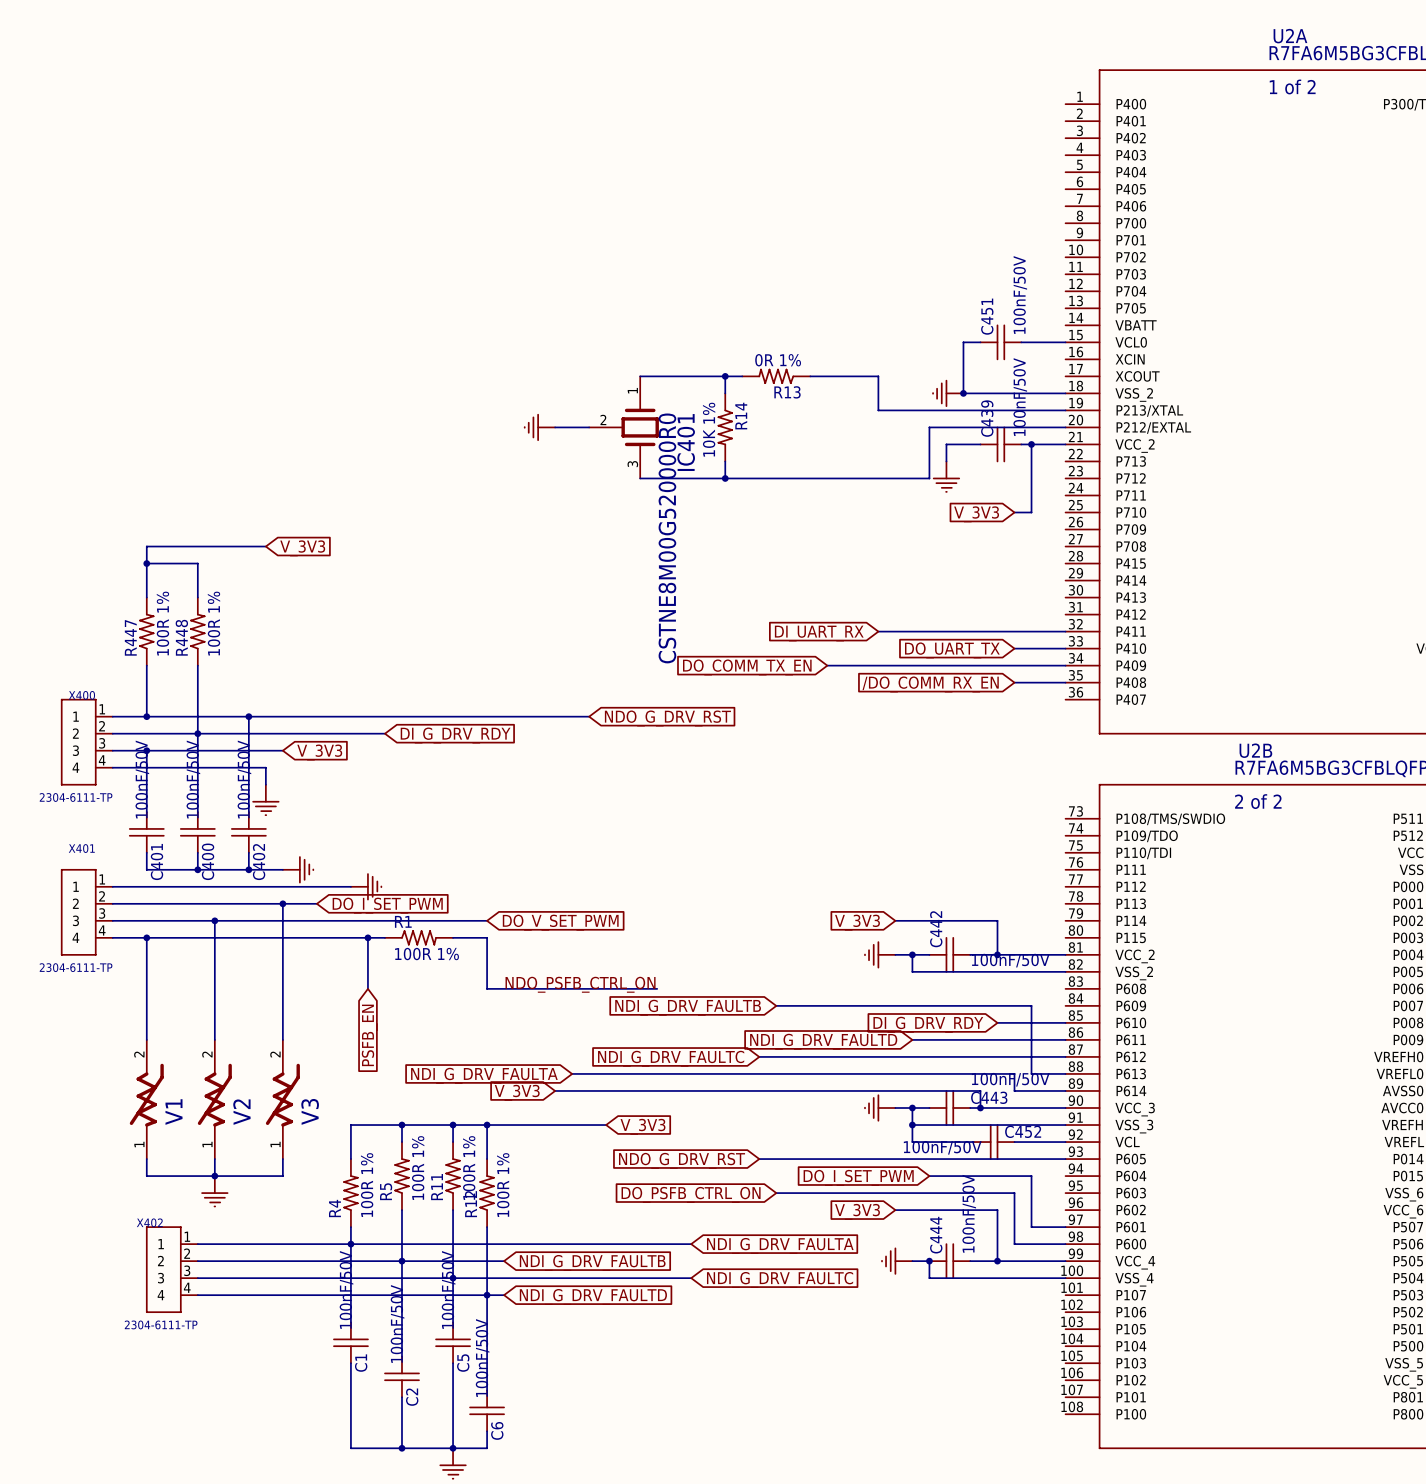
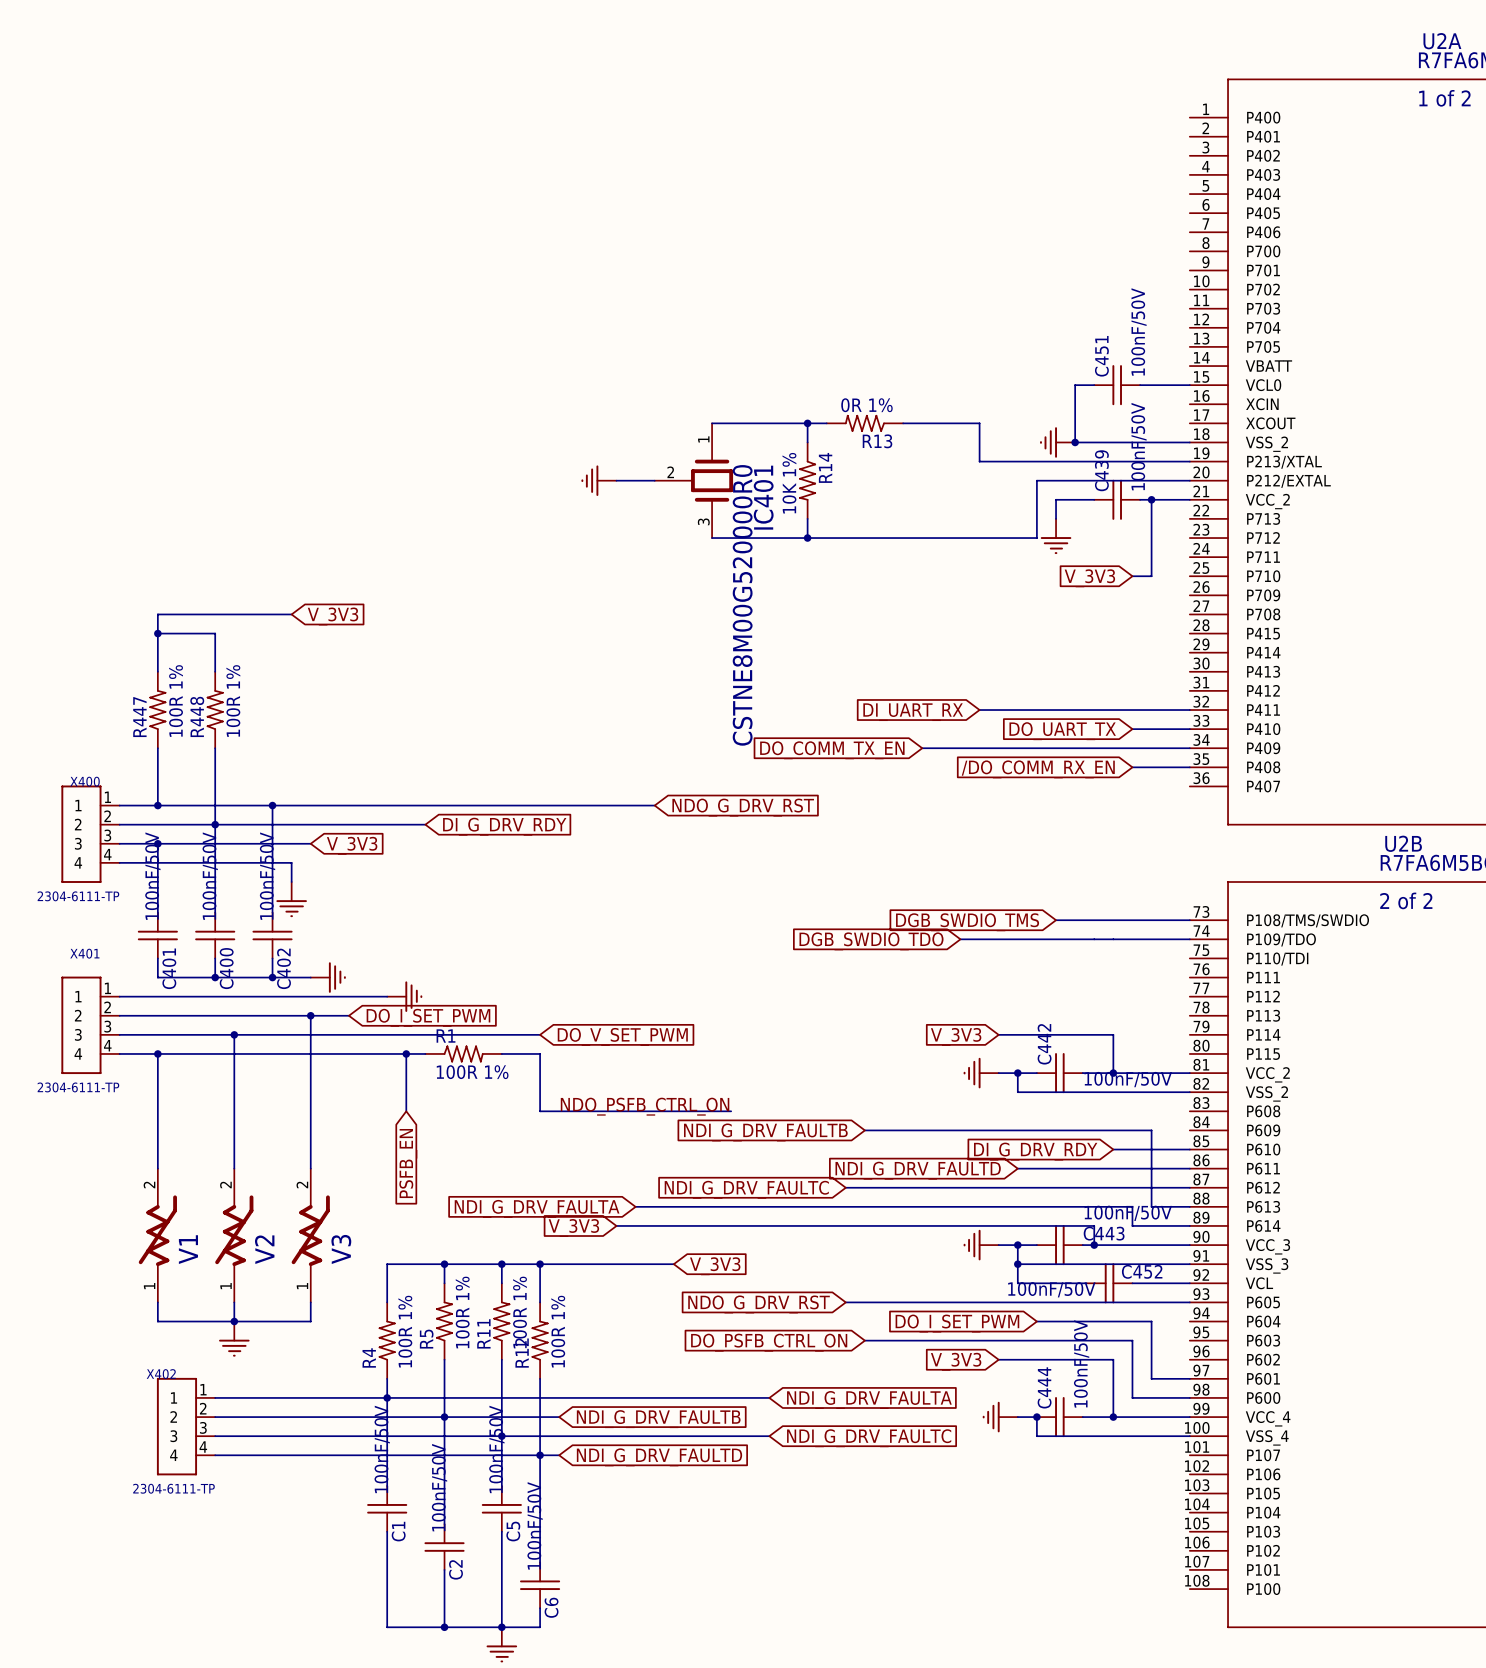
wire: none -> (1056, 920) (1189, 920)
global label: none -> DGB_SWDIO_TMS (967, 922)
wire: none -> (960, 939) (1189, 939)
global label: none -> DGB_SWDIO_TDO (871, 941)

